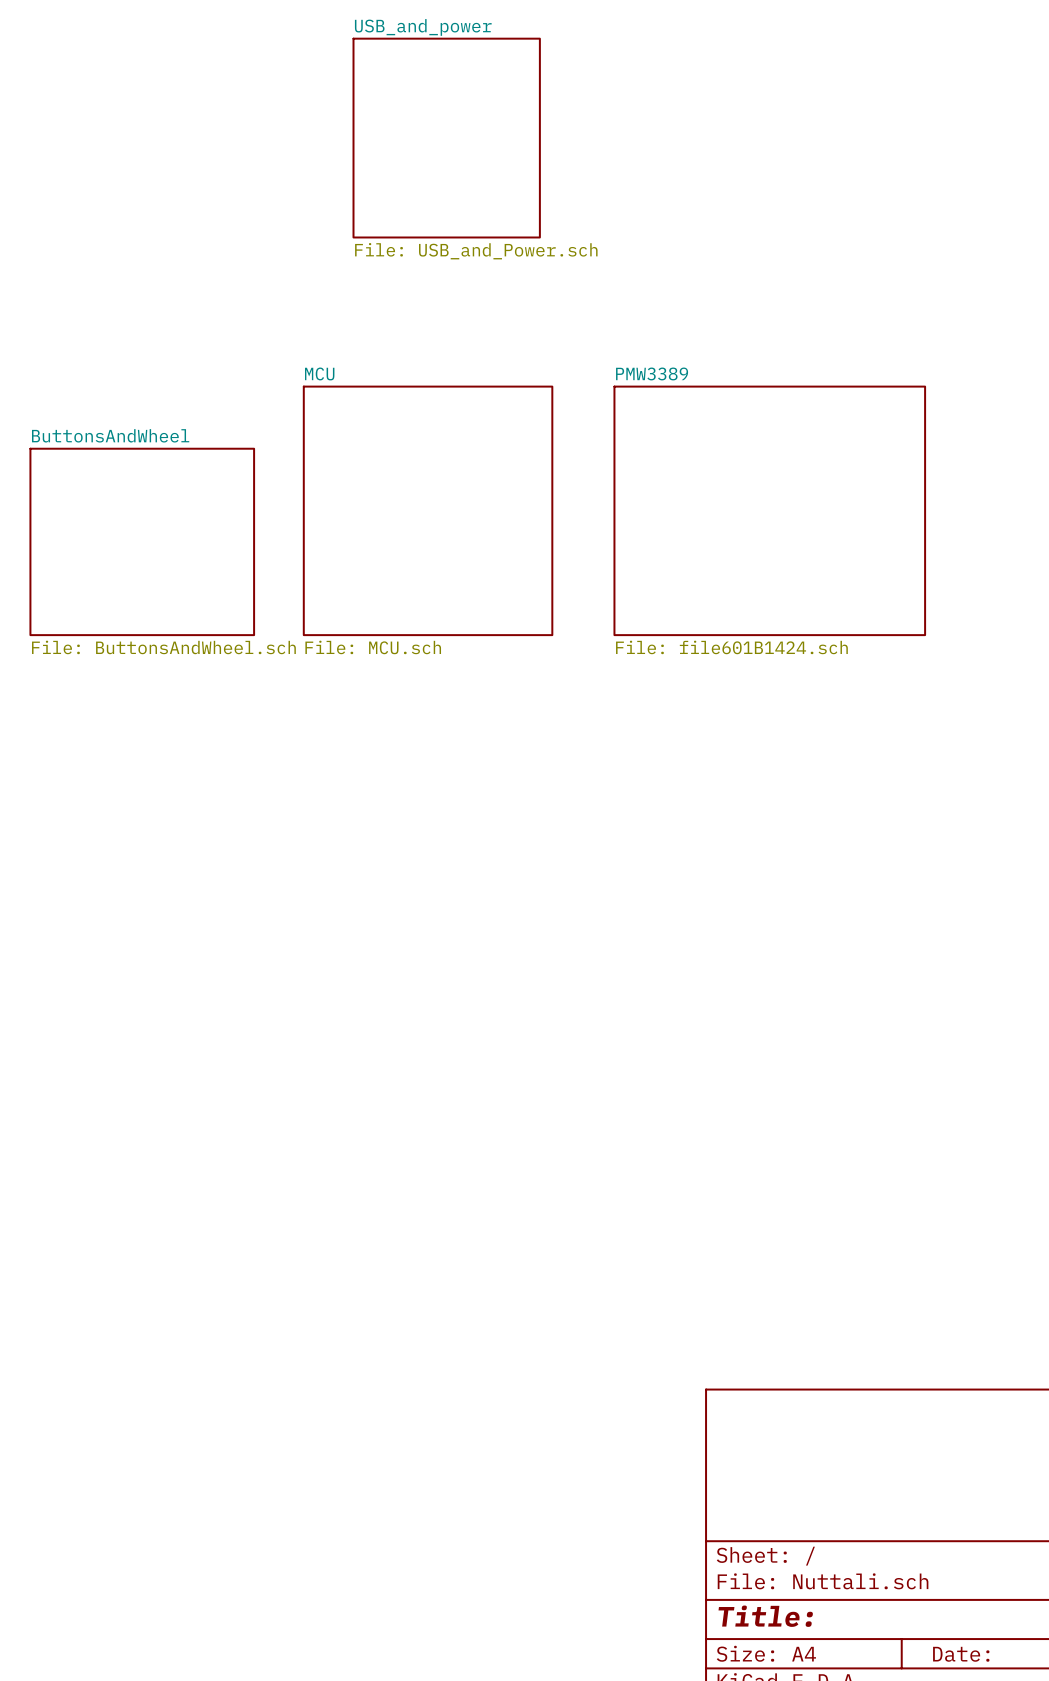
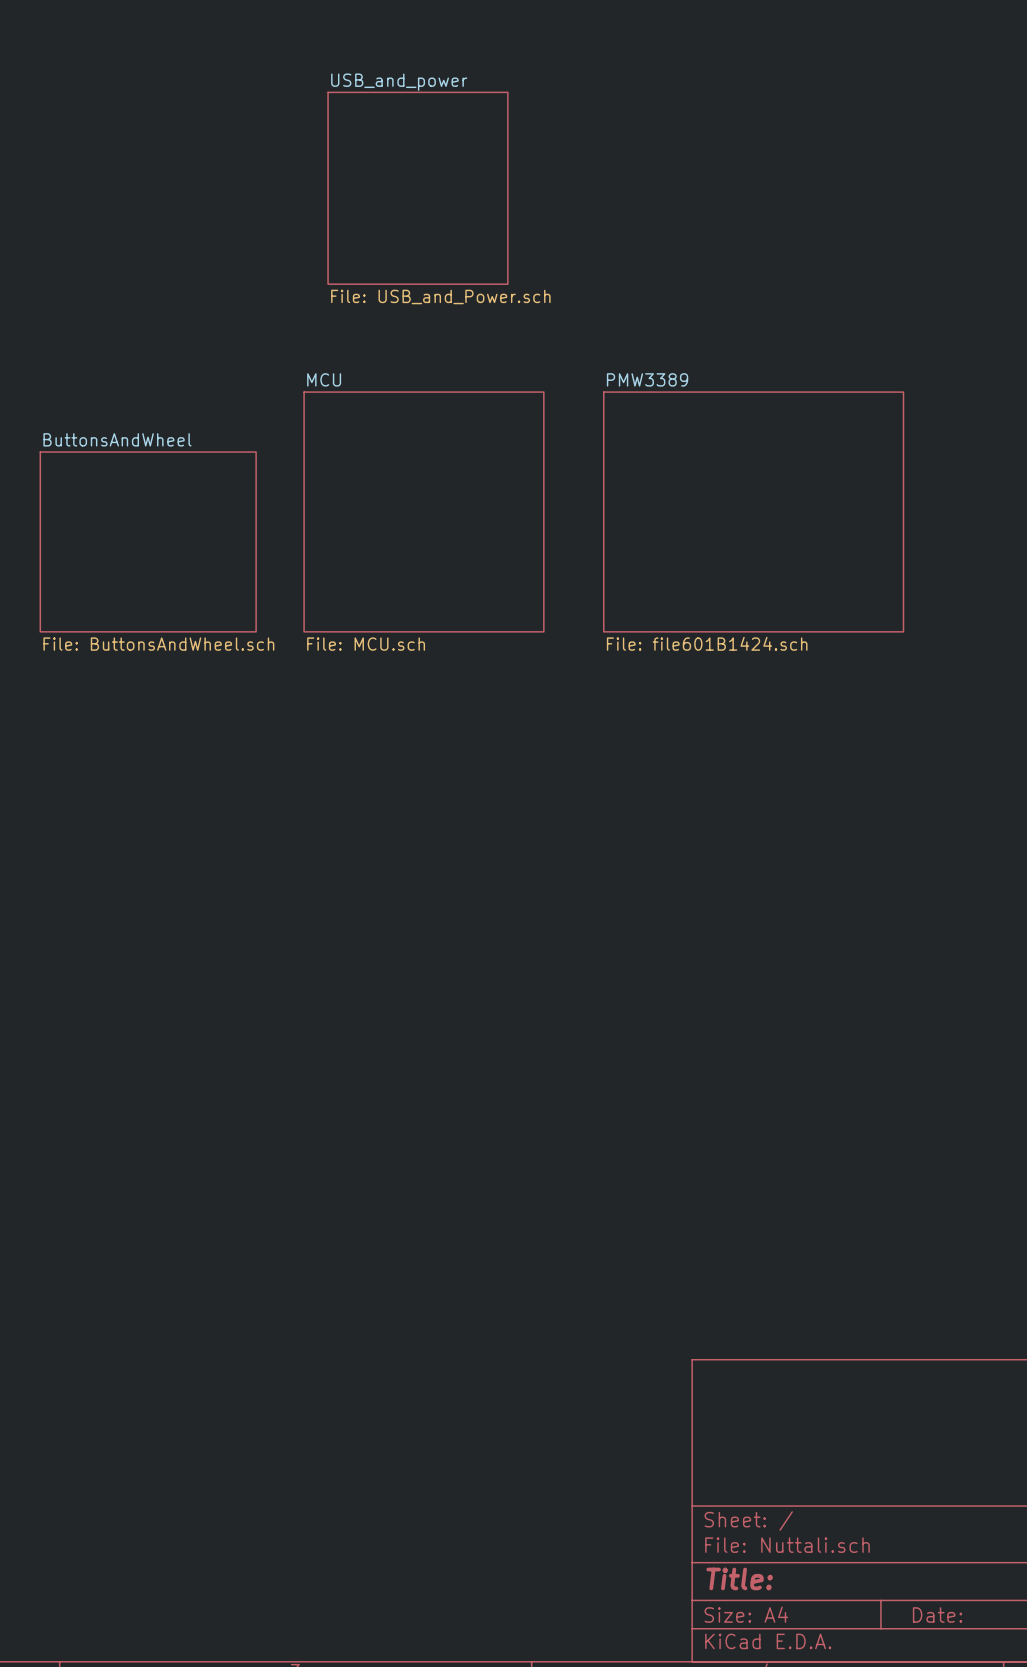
sheet USB_and_power position: (446, 138) -> (417, 188)

